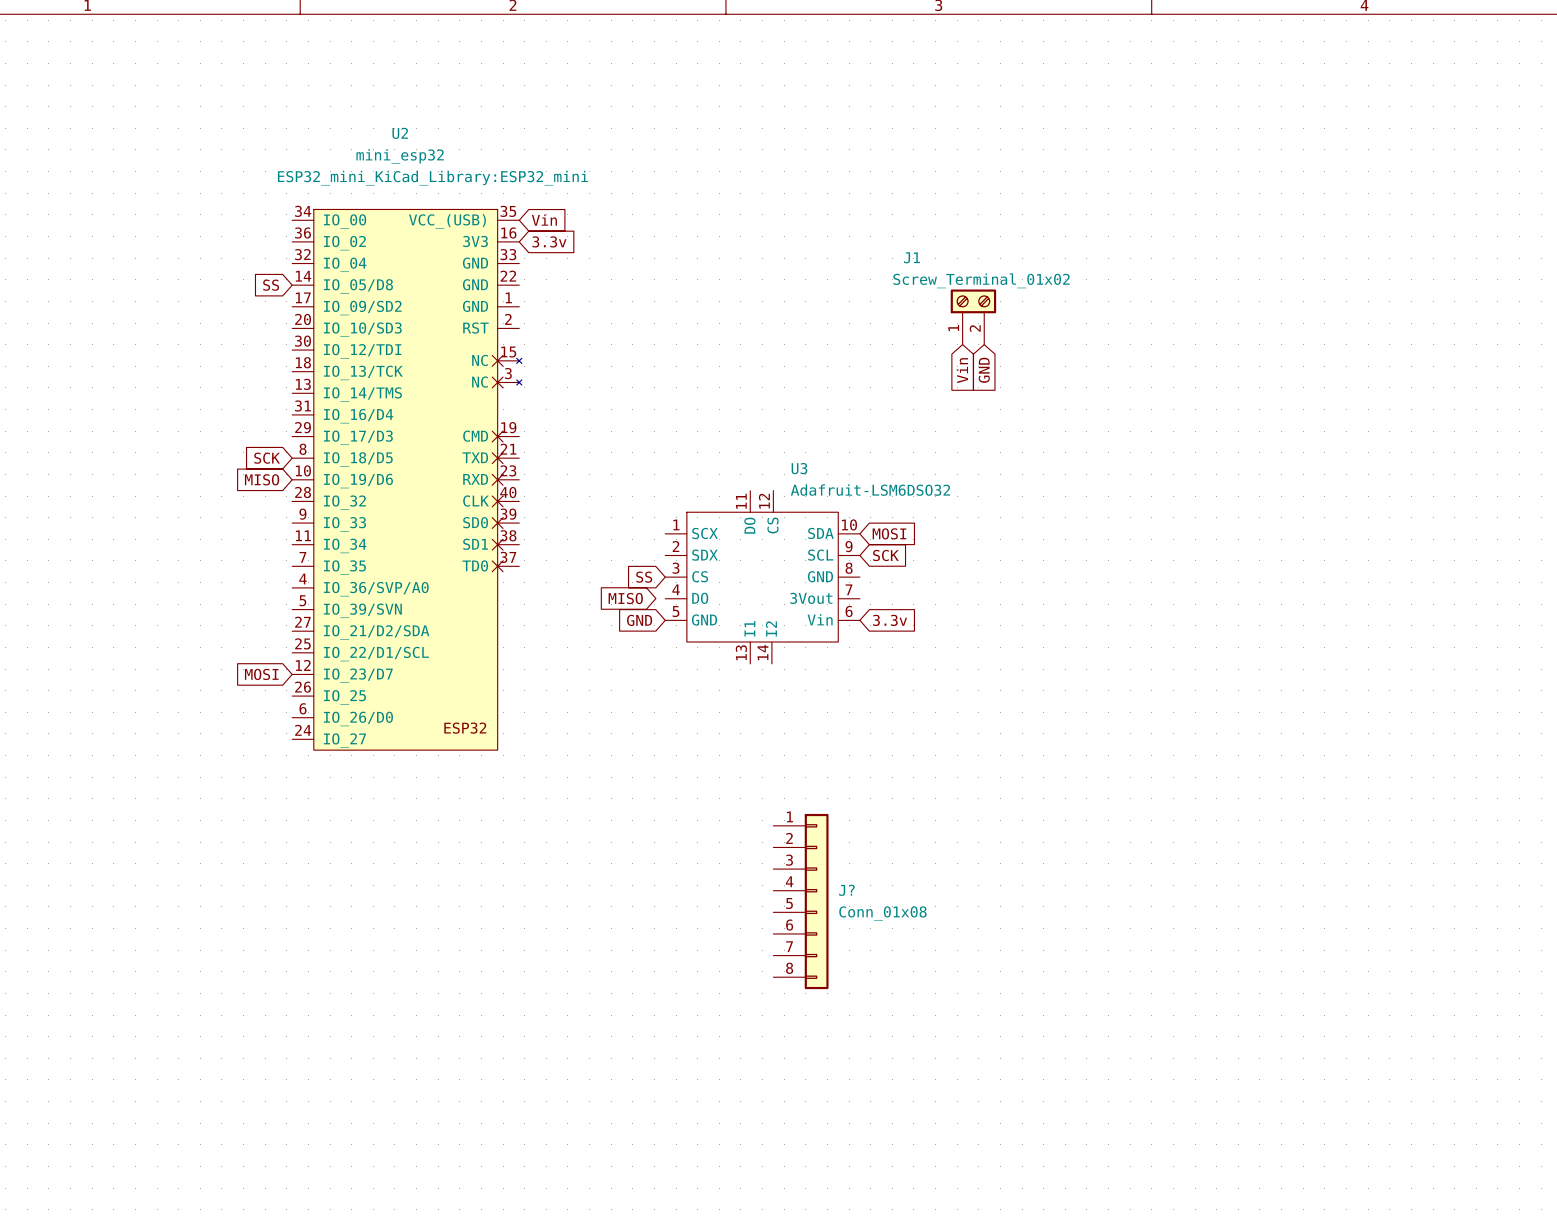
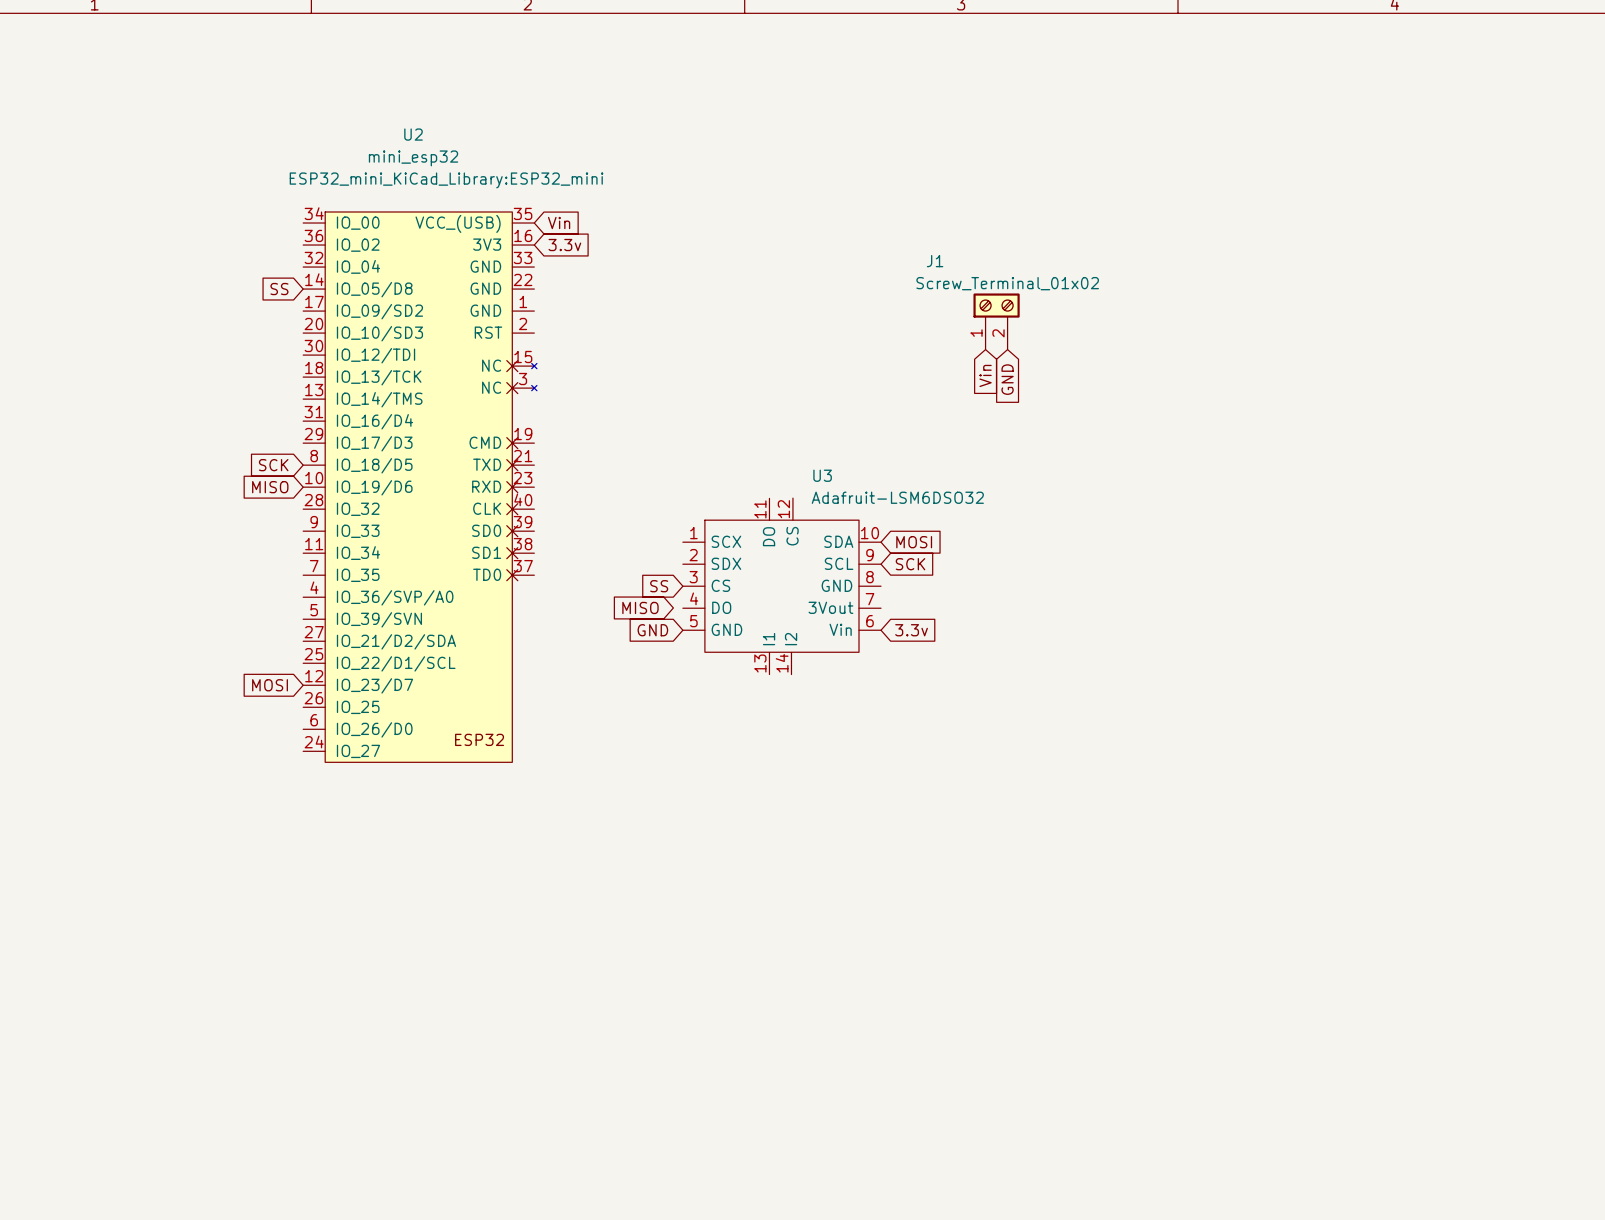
J?: Conn_01x08 (800, 901) -> none

